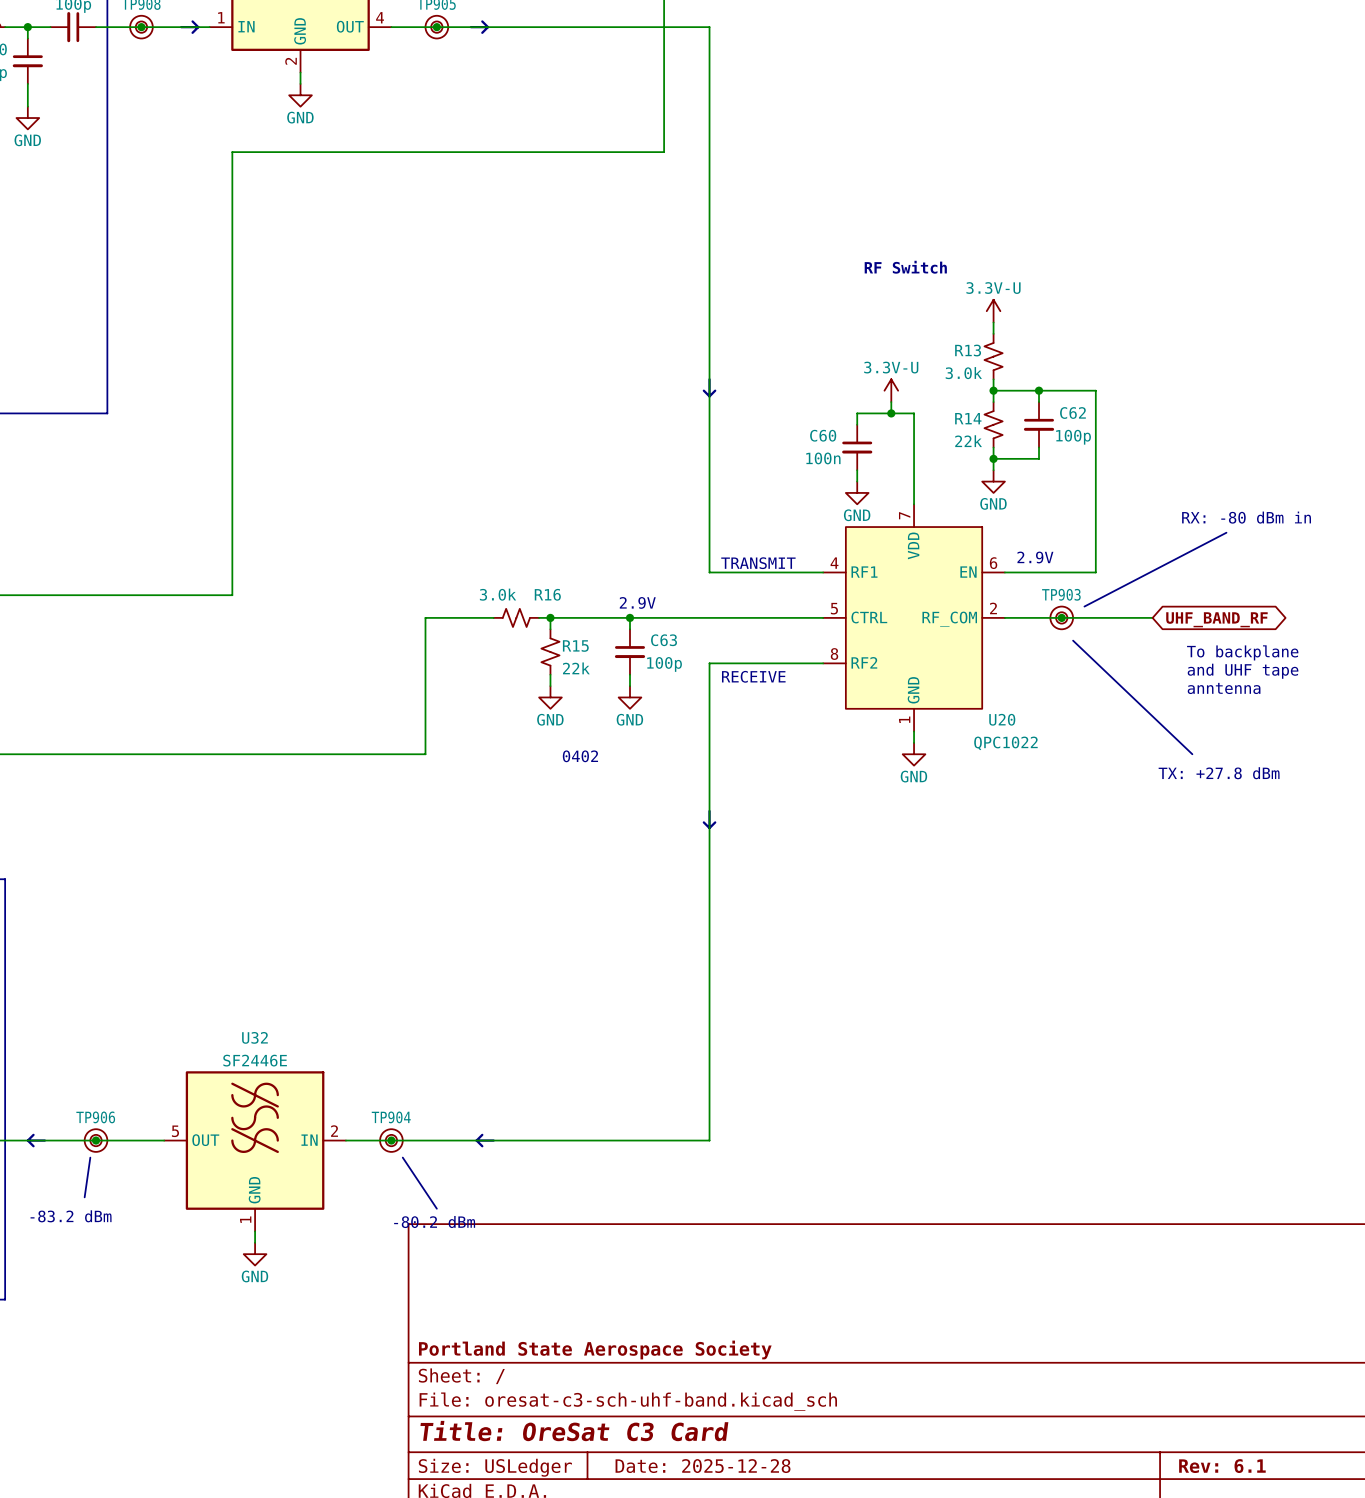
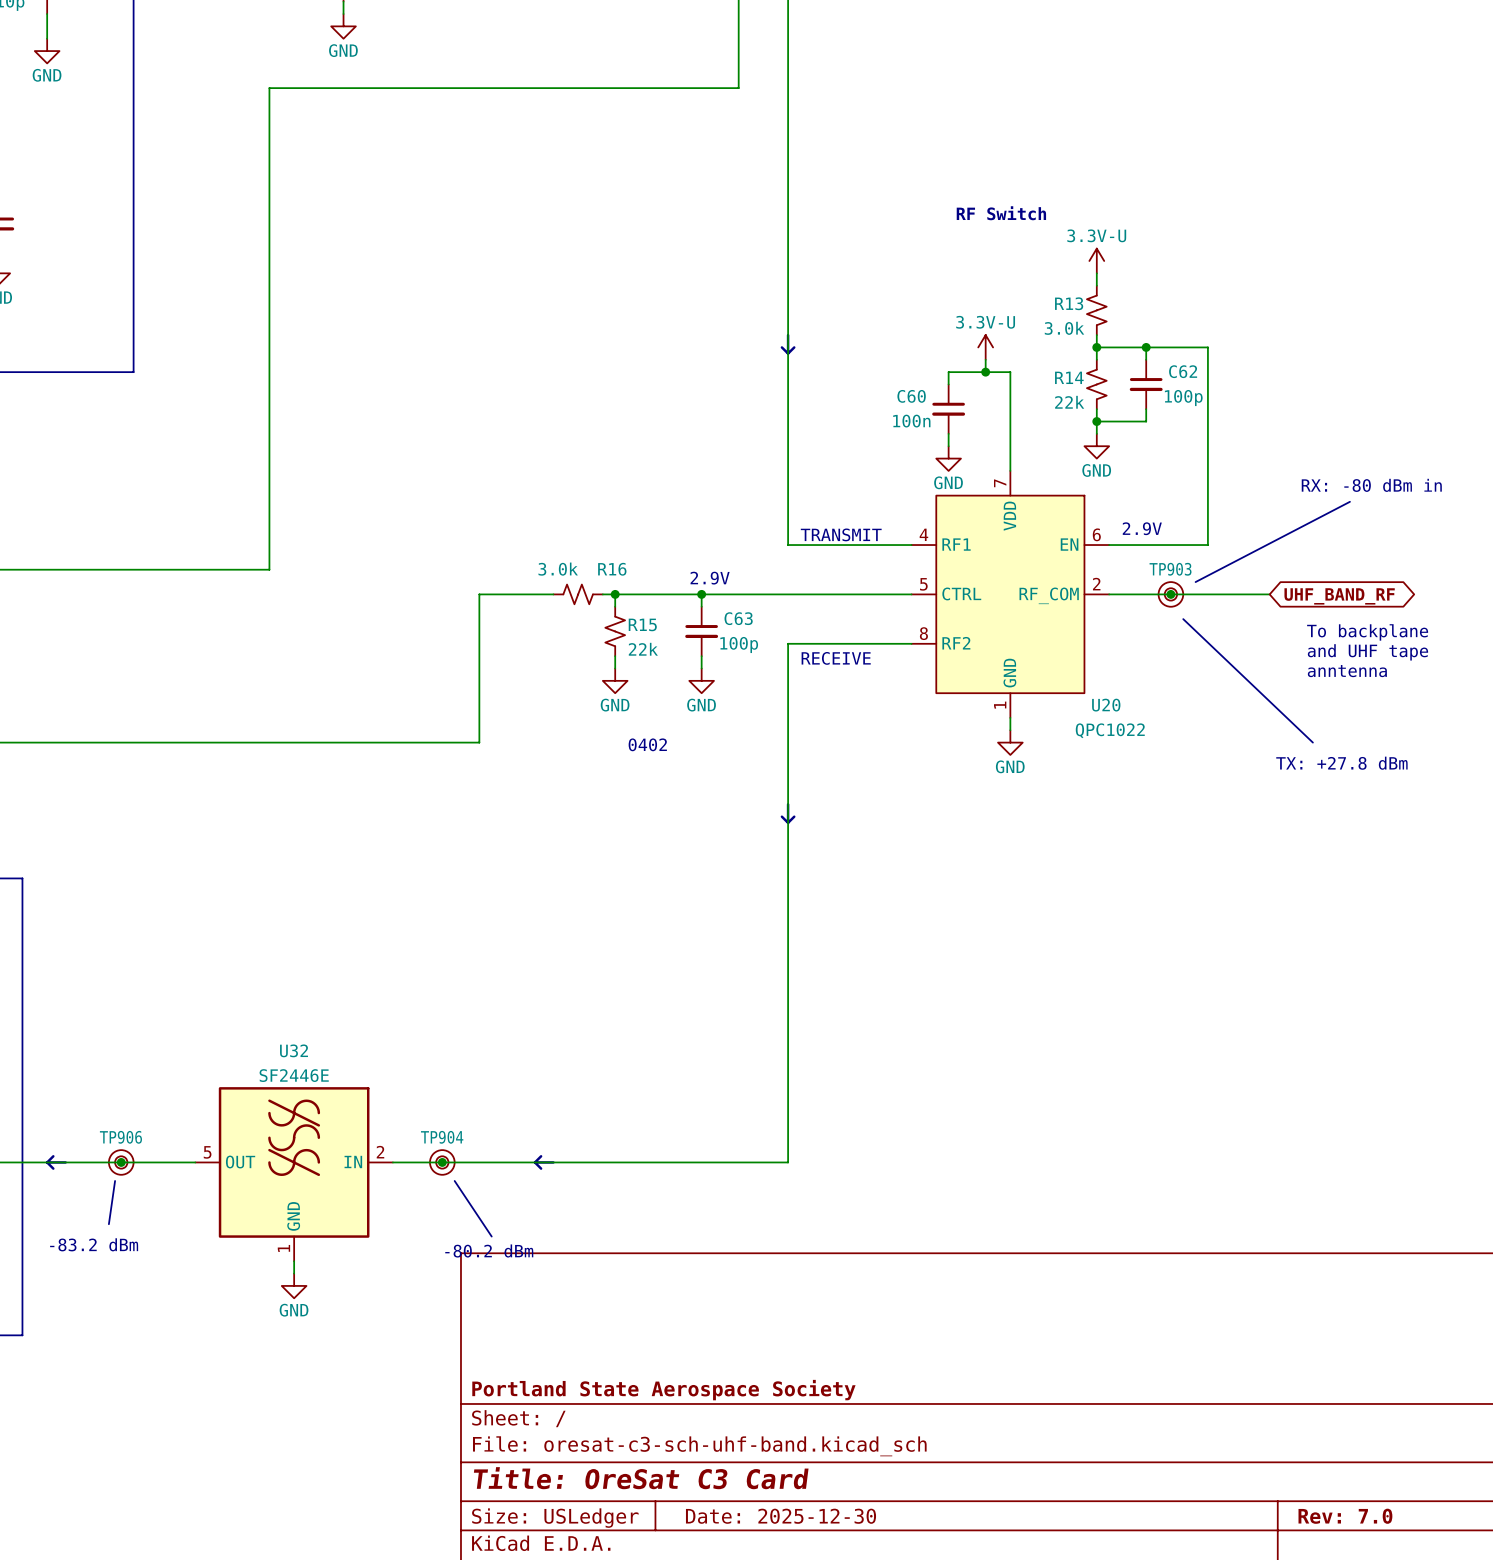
title block: Date: 2025-12-28 (703, 1466) -> Date: 2025-12-30 (781, 1516)
title block: Rev: 6.1 (1222, 1466) -> Rev: 7.0 (1345, 1516)

